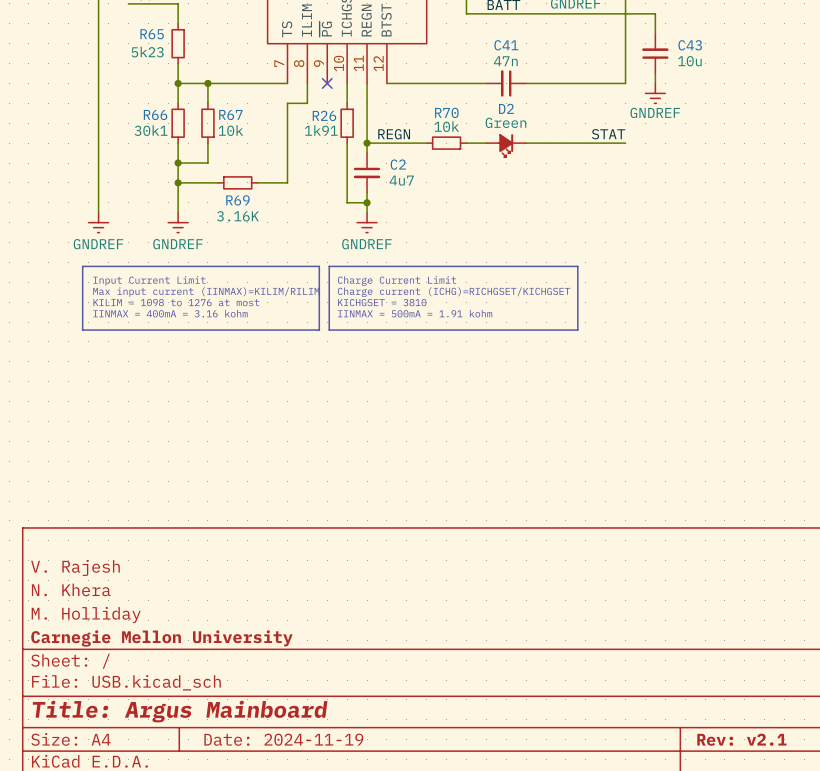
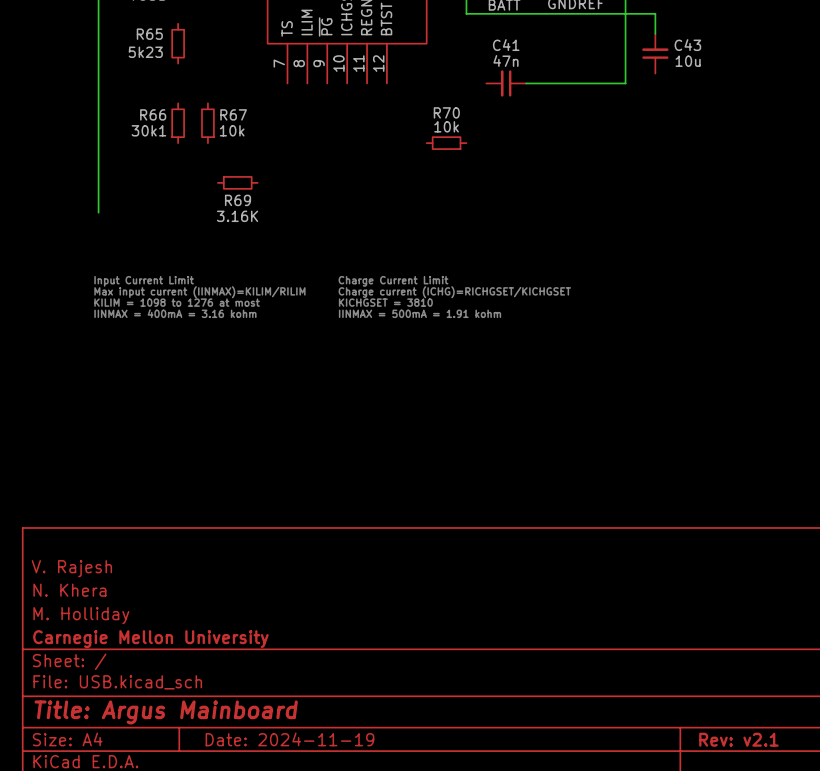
wire: (128, 3) (178, 3) (178, 23) -> none
wire: (178, 63) (178, 103) -> none
wire: (655, 73) (655, 83) -> none
wire: (178, 83) (287, 83) -> none
junction: (178, 83) -> none
wire: (207, 83) (207, 103) -> none
junction: (207, 83) -> none
wire: (307, 83) (307, 103) (287, 103) (287, 182) (257, 182) -> none
no-connect mark: (327, 83) -> none
wire: (347, 83) (347, 103) -> none
wire: (367, 83) (367, 153) -> none
wire: (386, 83) (486, 83) -> none
power symbol: GNDREF (655, 93) -> none
R26: 1k91 (347, 123) -> none
label: REGN (394, 134) -> none
label: STAT (608, 134) -> none
wire: (178, 143) (178, 212) -> none
wire: (207, 143) (207, 163) (178, 163) -> none
wire: (347, 143) (347, 202) (367, 202) -> none
wire: (367, 143) (426, 143) -> none
junction: (367, 143) -> none
wire: (466, 143) (486, 143) -> none
wire: (526, 143) (625, 143) -> none
D2: (506, 145) -> none
junction: (178, 163) -> none
C2: 4u7 (367, 172) -> none
wire: (178, 182) (217, 182) -> none
junction: (178, 182) -> none
wire: (367, 192) (367, 212) -> none
junction: (367, 202) -> none
power symbol: GNDREF (98, 222) -> none
power symbol: GNDREF (178, 222) -> none
power symbol: GNDREF (367, 222) -> none
line: (82, 266) (319, 266) (319, 330) (82, 330) (82, 266) -> none
line: (329, 266) (329, 330) (577, 330) (577, 266) (329, 266) -> none

